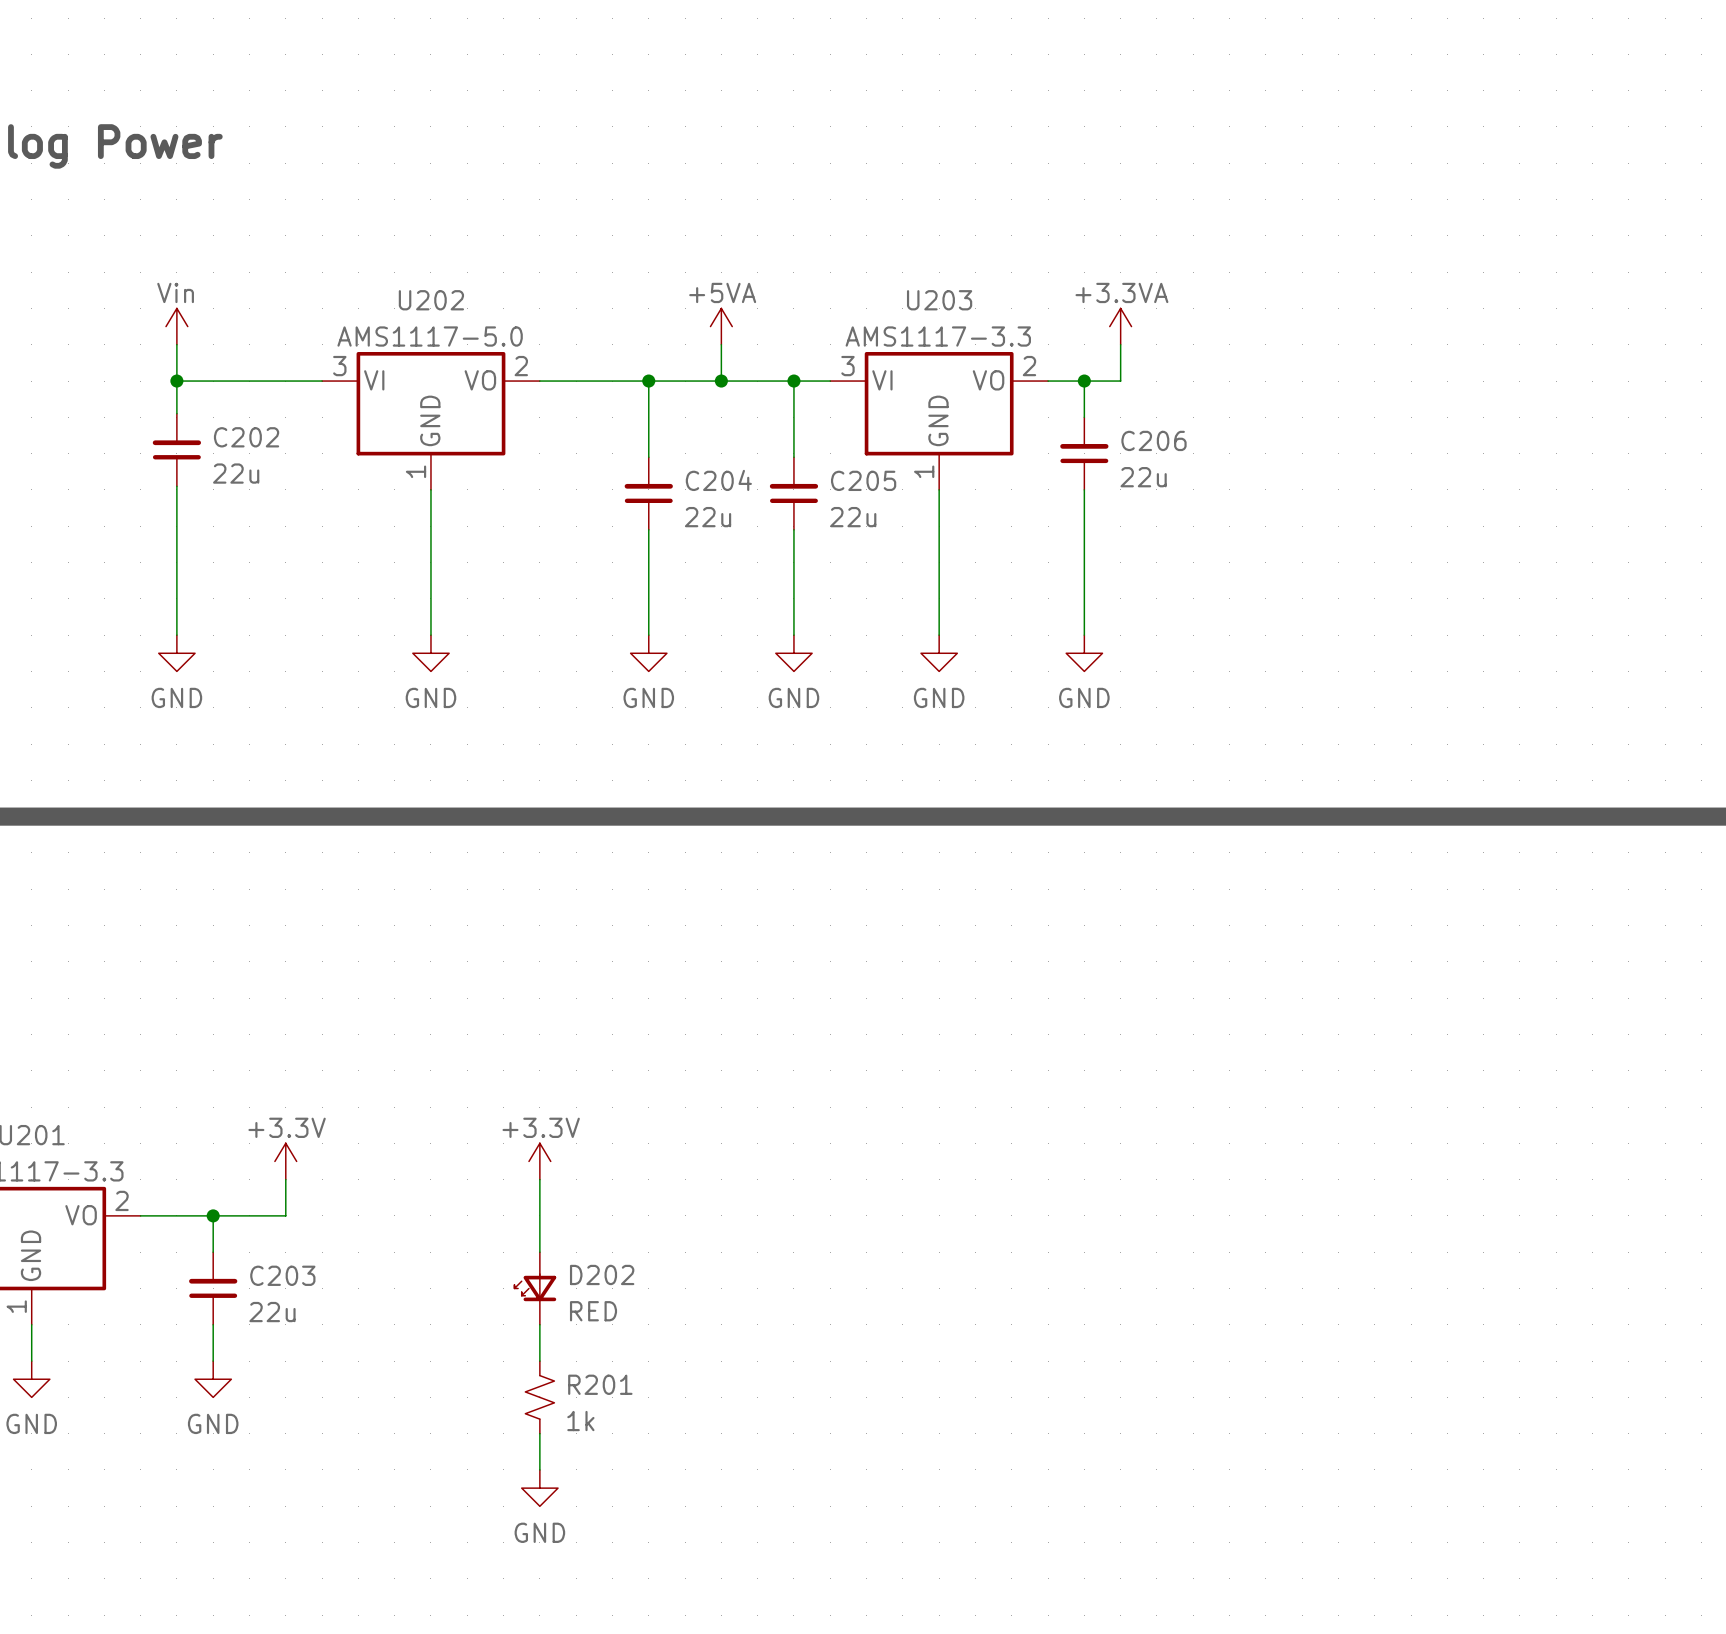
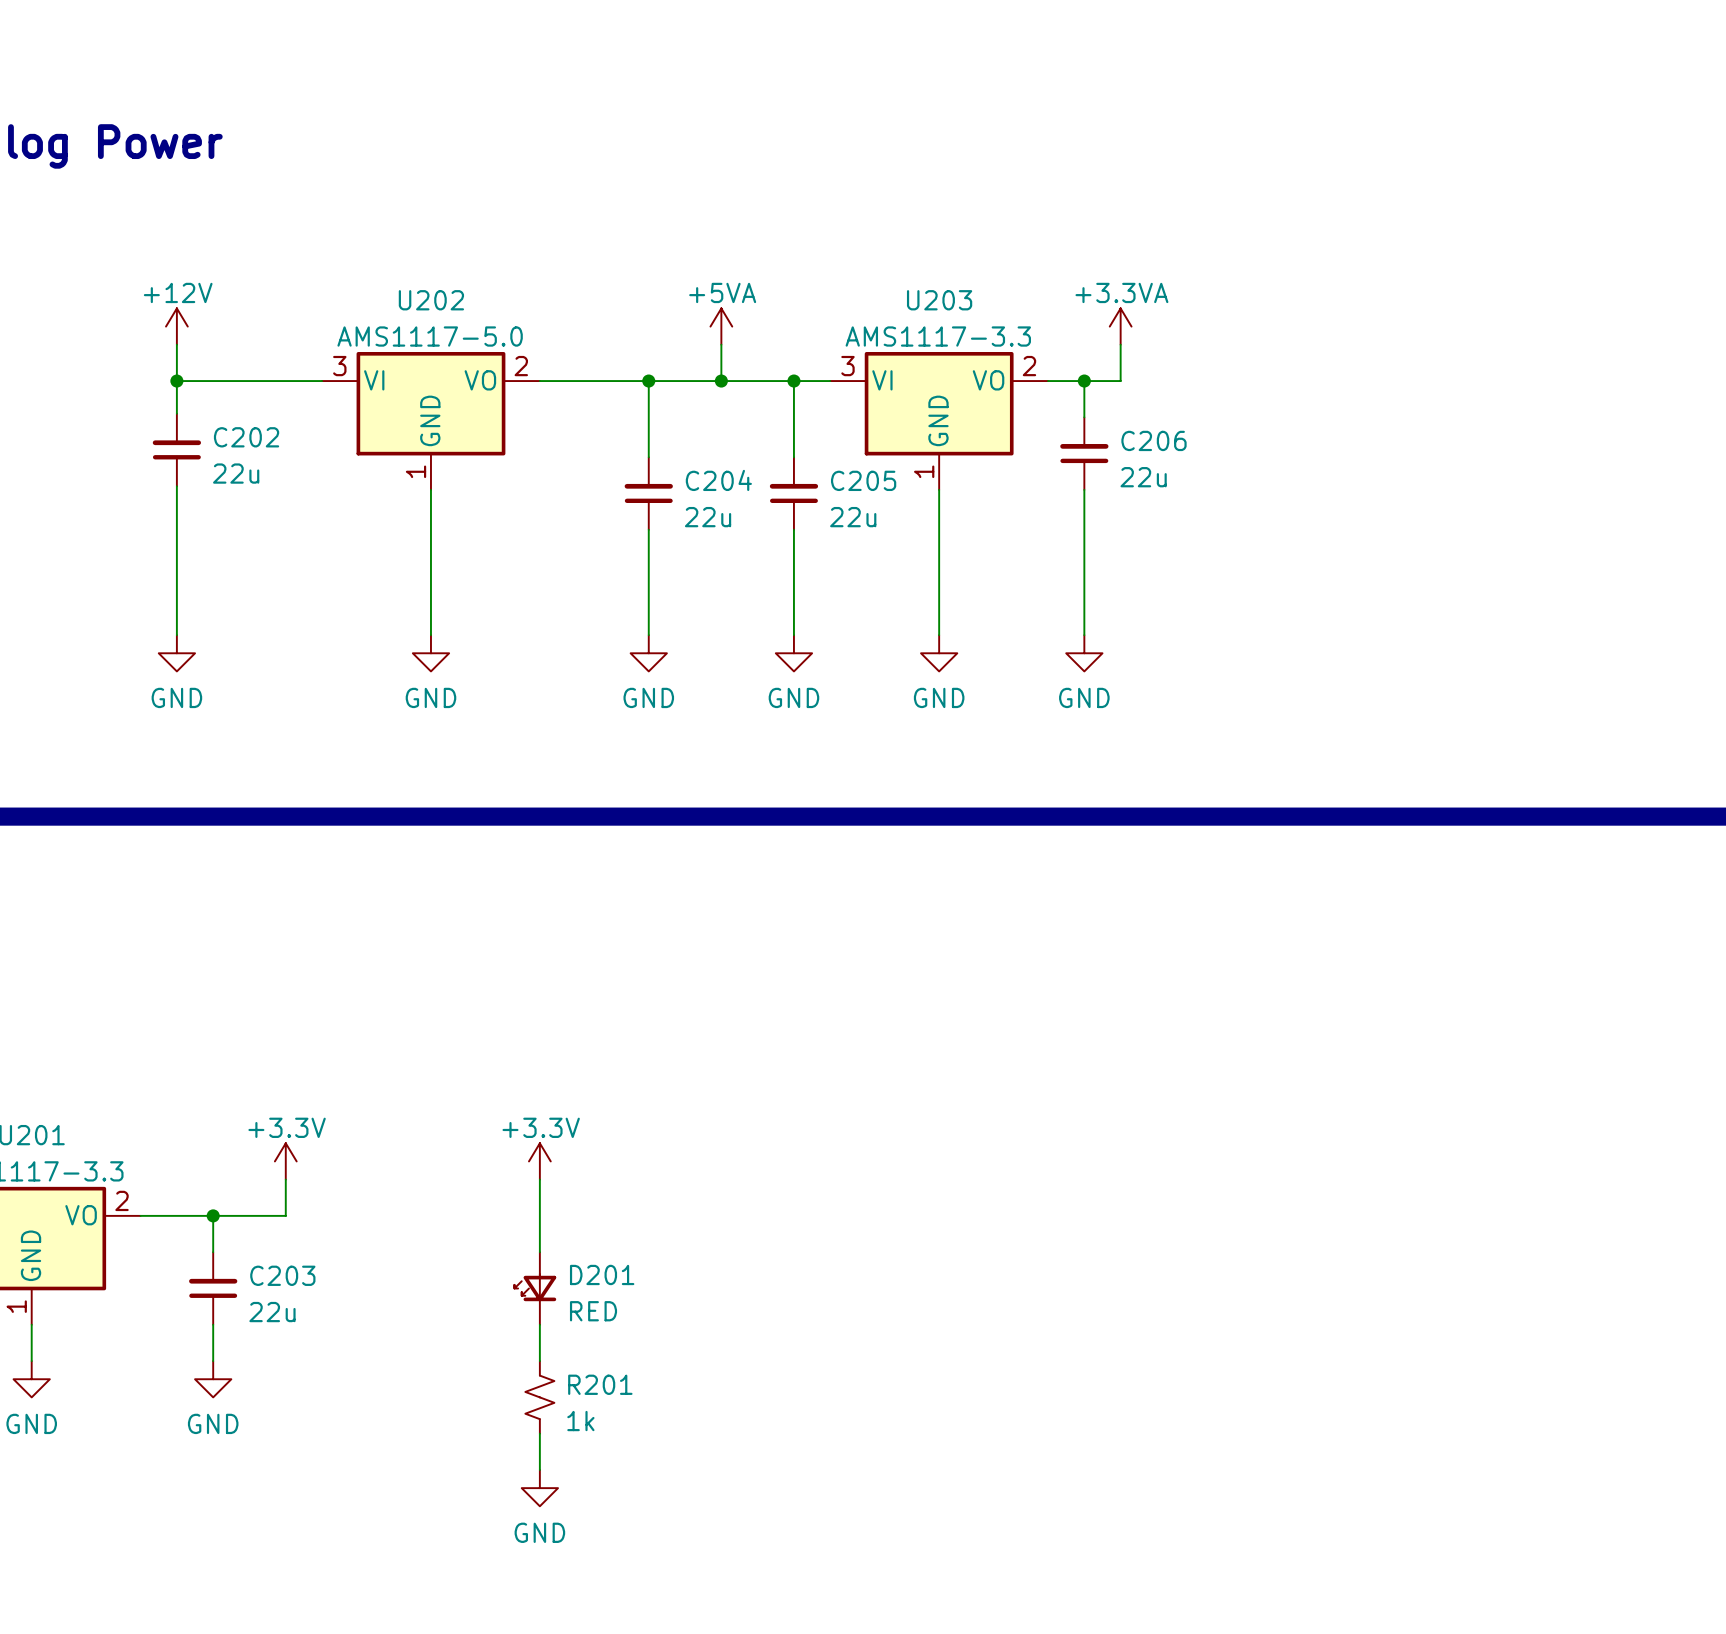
power symbol: Vin (176, 326) -> +12V (176, 326)
D202 name: D202 (602, 1274) -> D201 (602, 1274)

